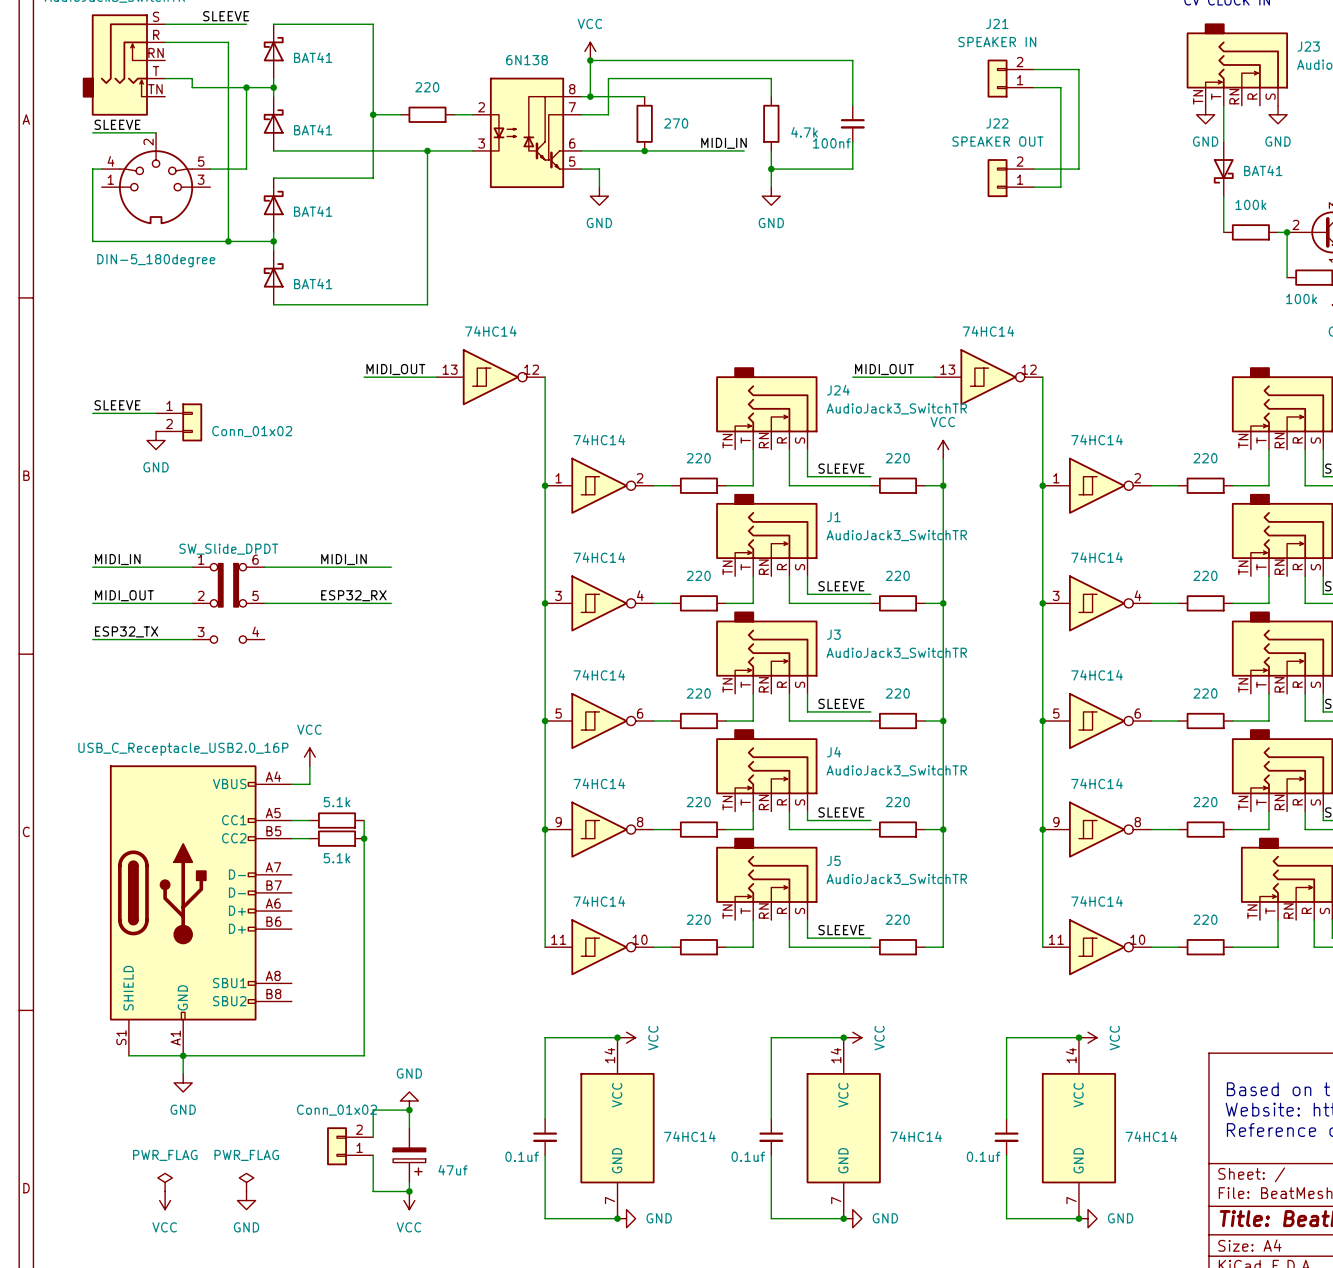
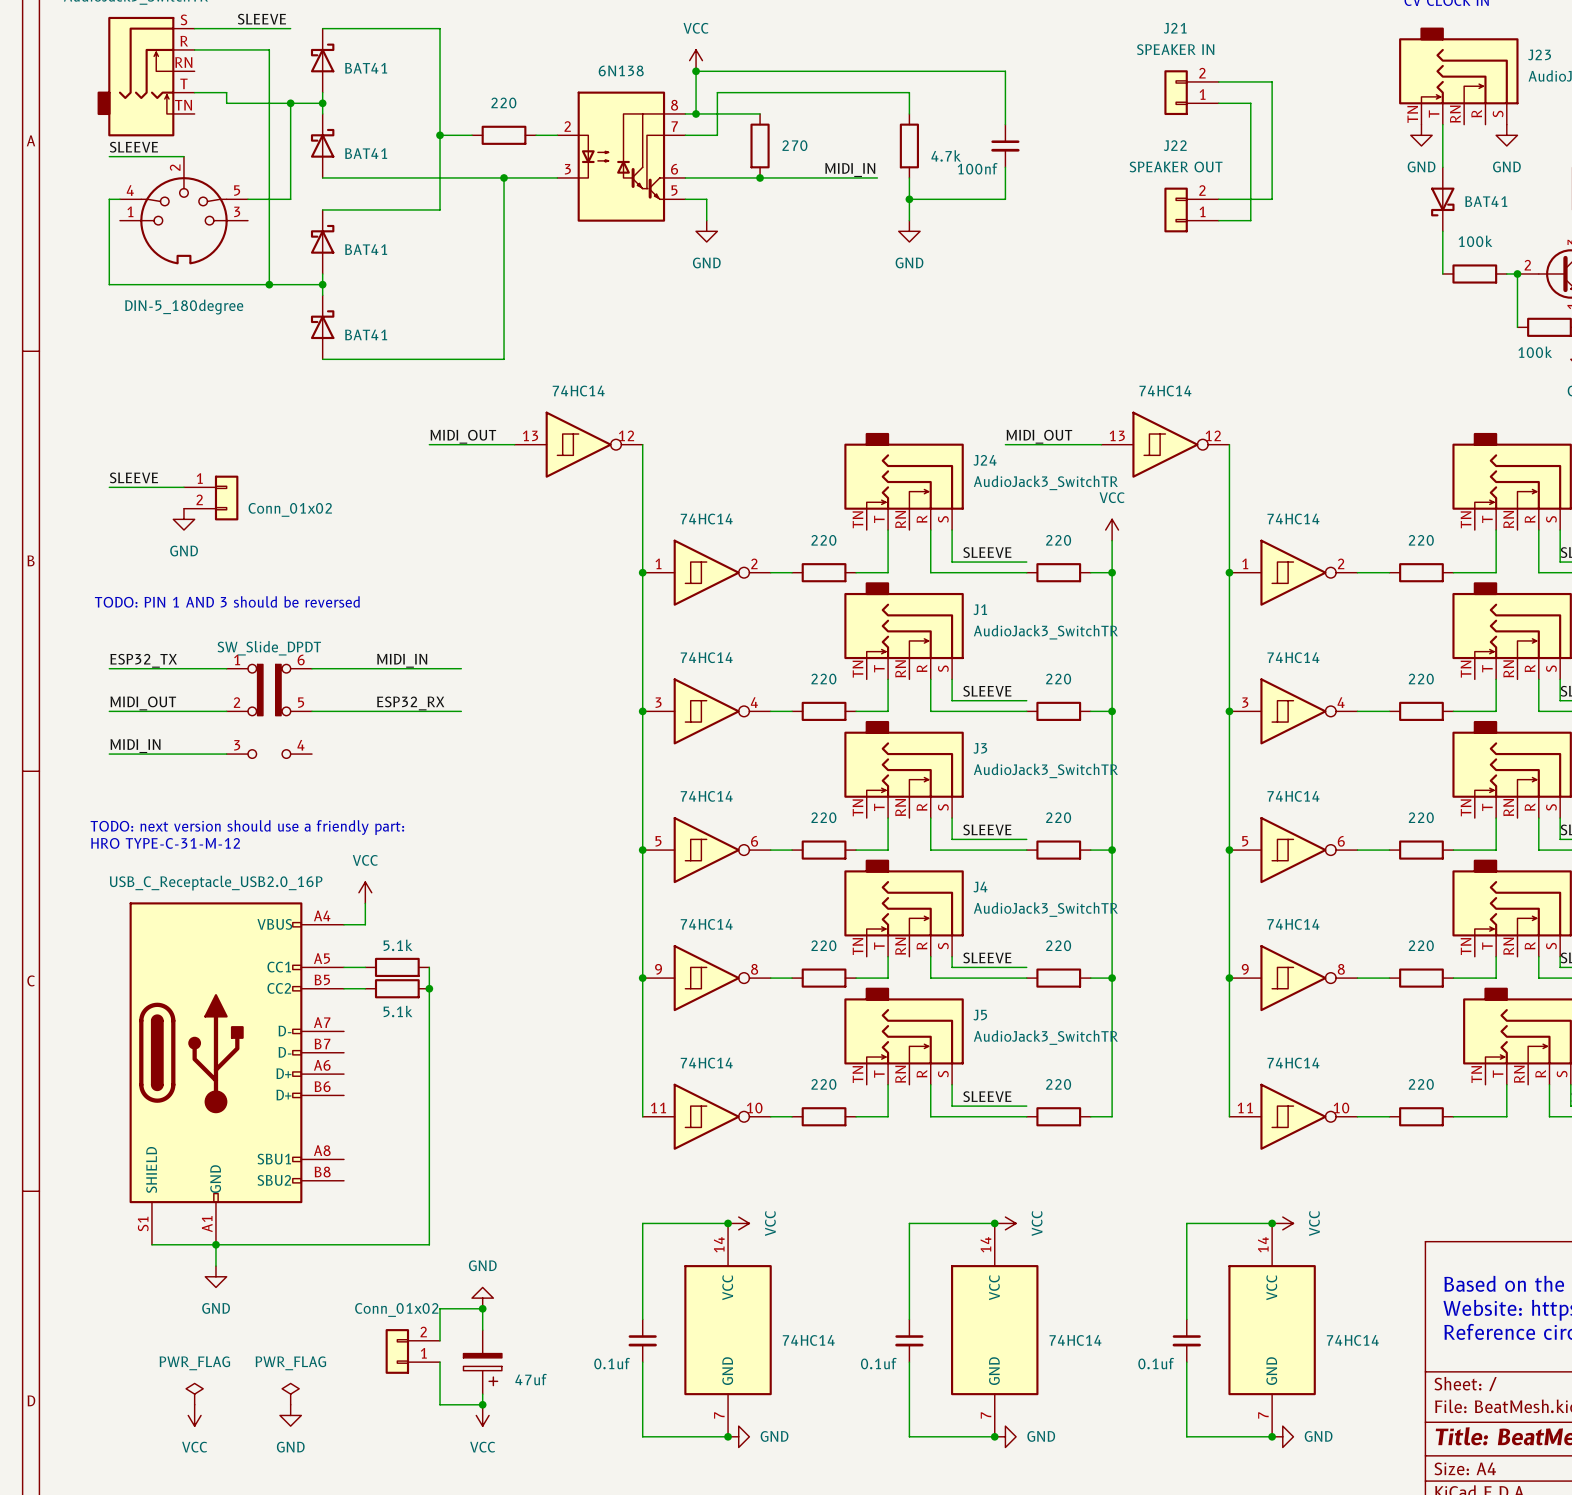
text: none -> TODO: PIN 1 AND 3 should be reversed (227, 601)
label: MIDI_IN (117, 559) -> ESP32_TX (143, 660)
label: ESP32_TX (126, 631) -> MIDI_IN (135, 746)
text: none -> TODO: next version should use a friendly part: (247, 827)
text: none -> HRO TYPE-C-31-M-12 (165, 843)

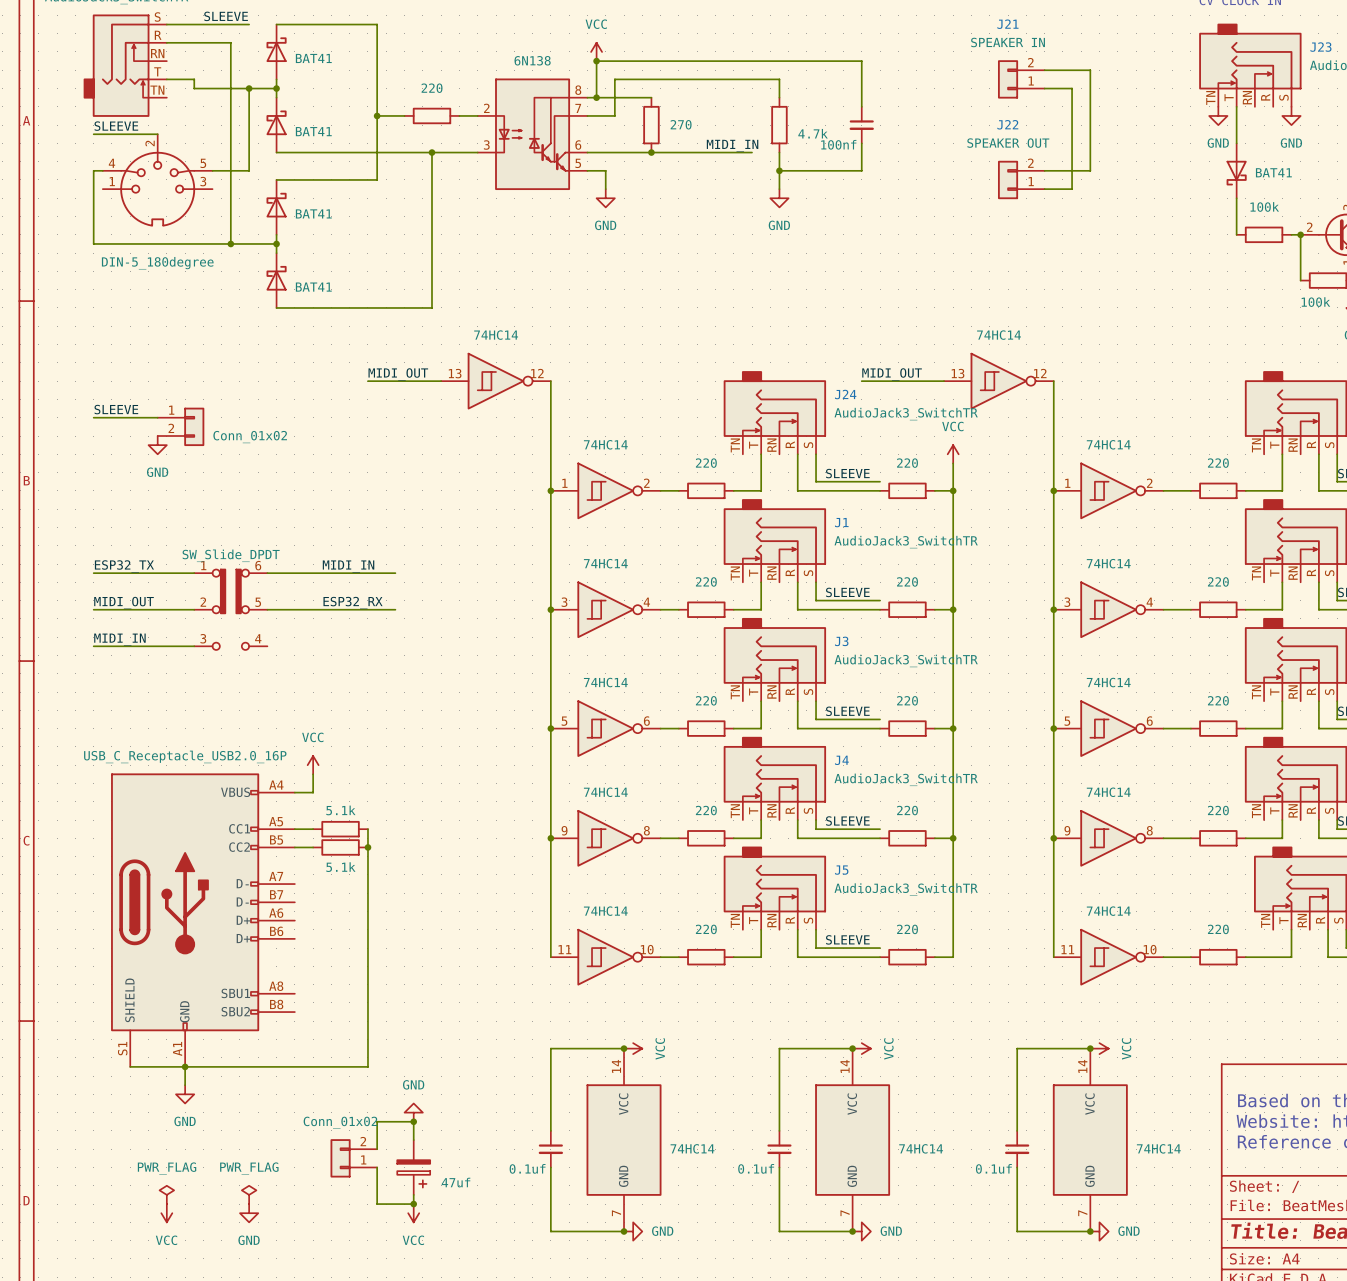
text: TODO: PIN 1 AND 3 should be reversed (227, 601) -> none
text: TODO: next version should use a friendly part: (247, 827) -> none
text: HRO TYPE-C-31-M-12 (165, 843) -> none

